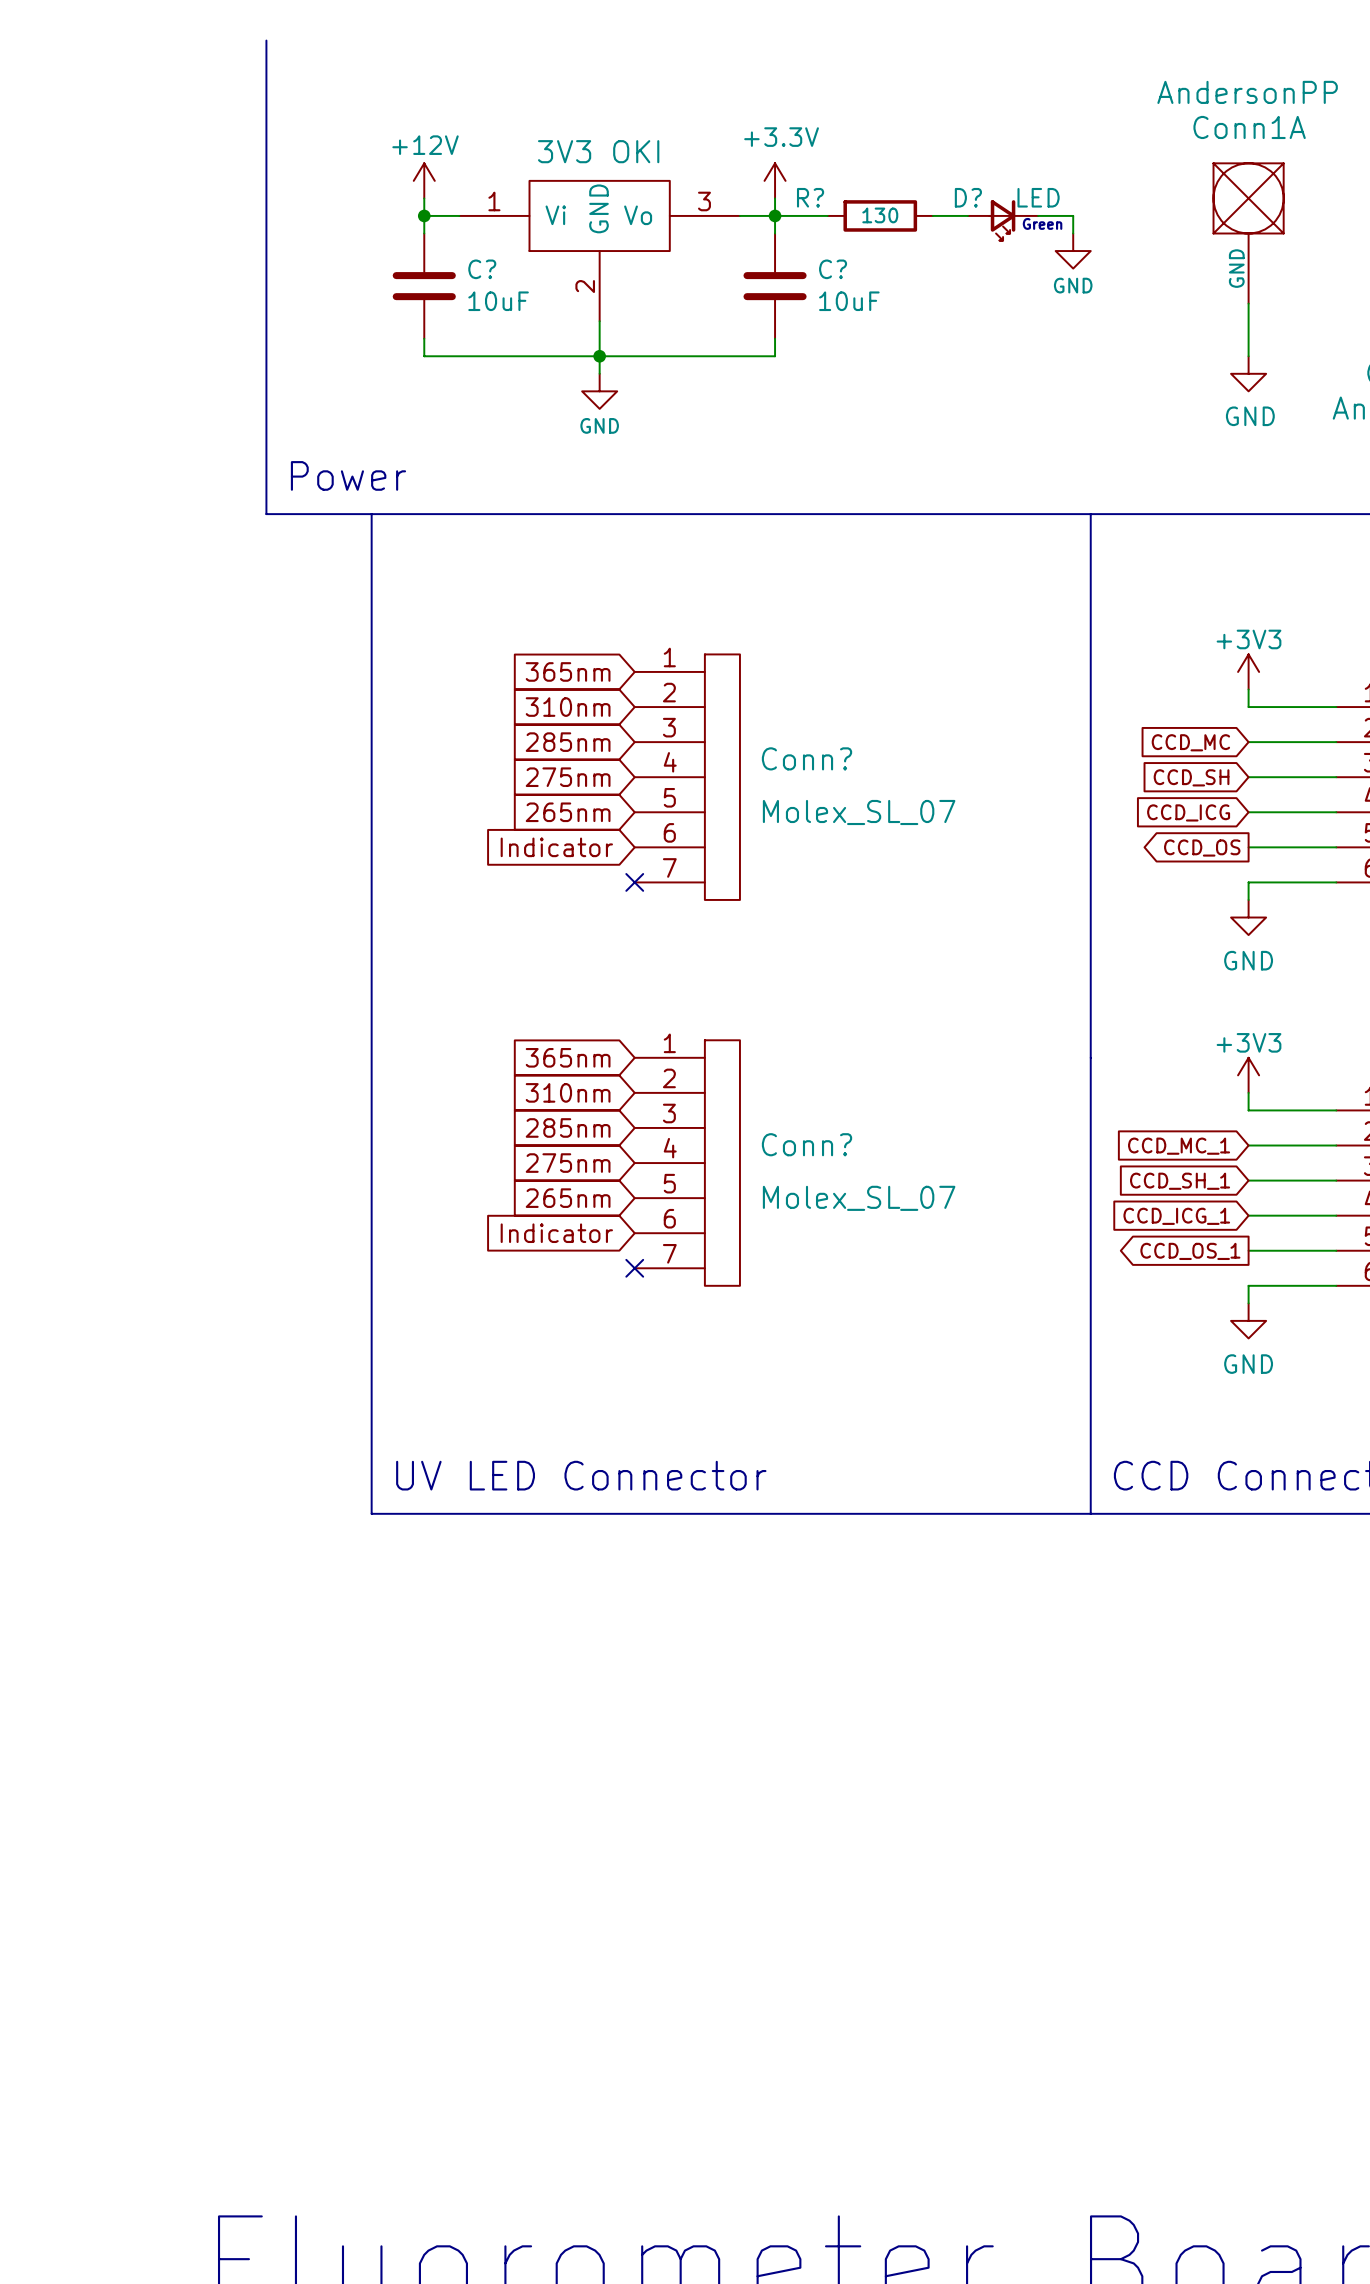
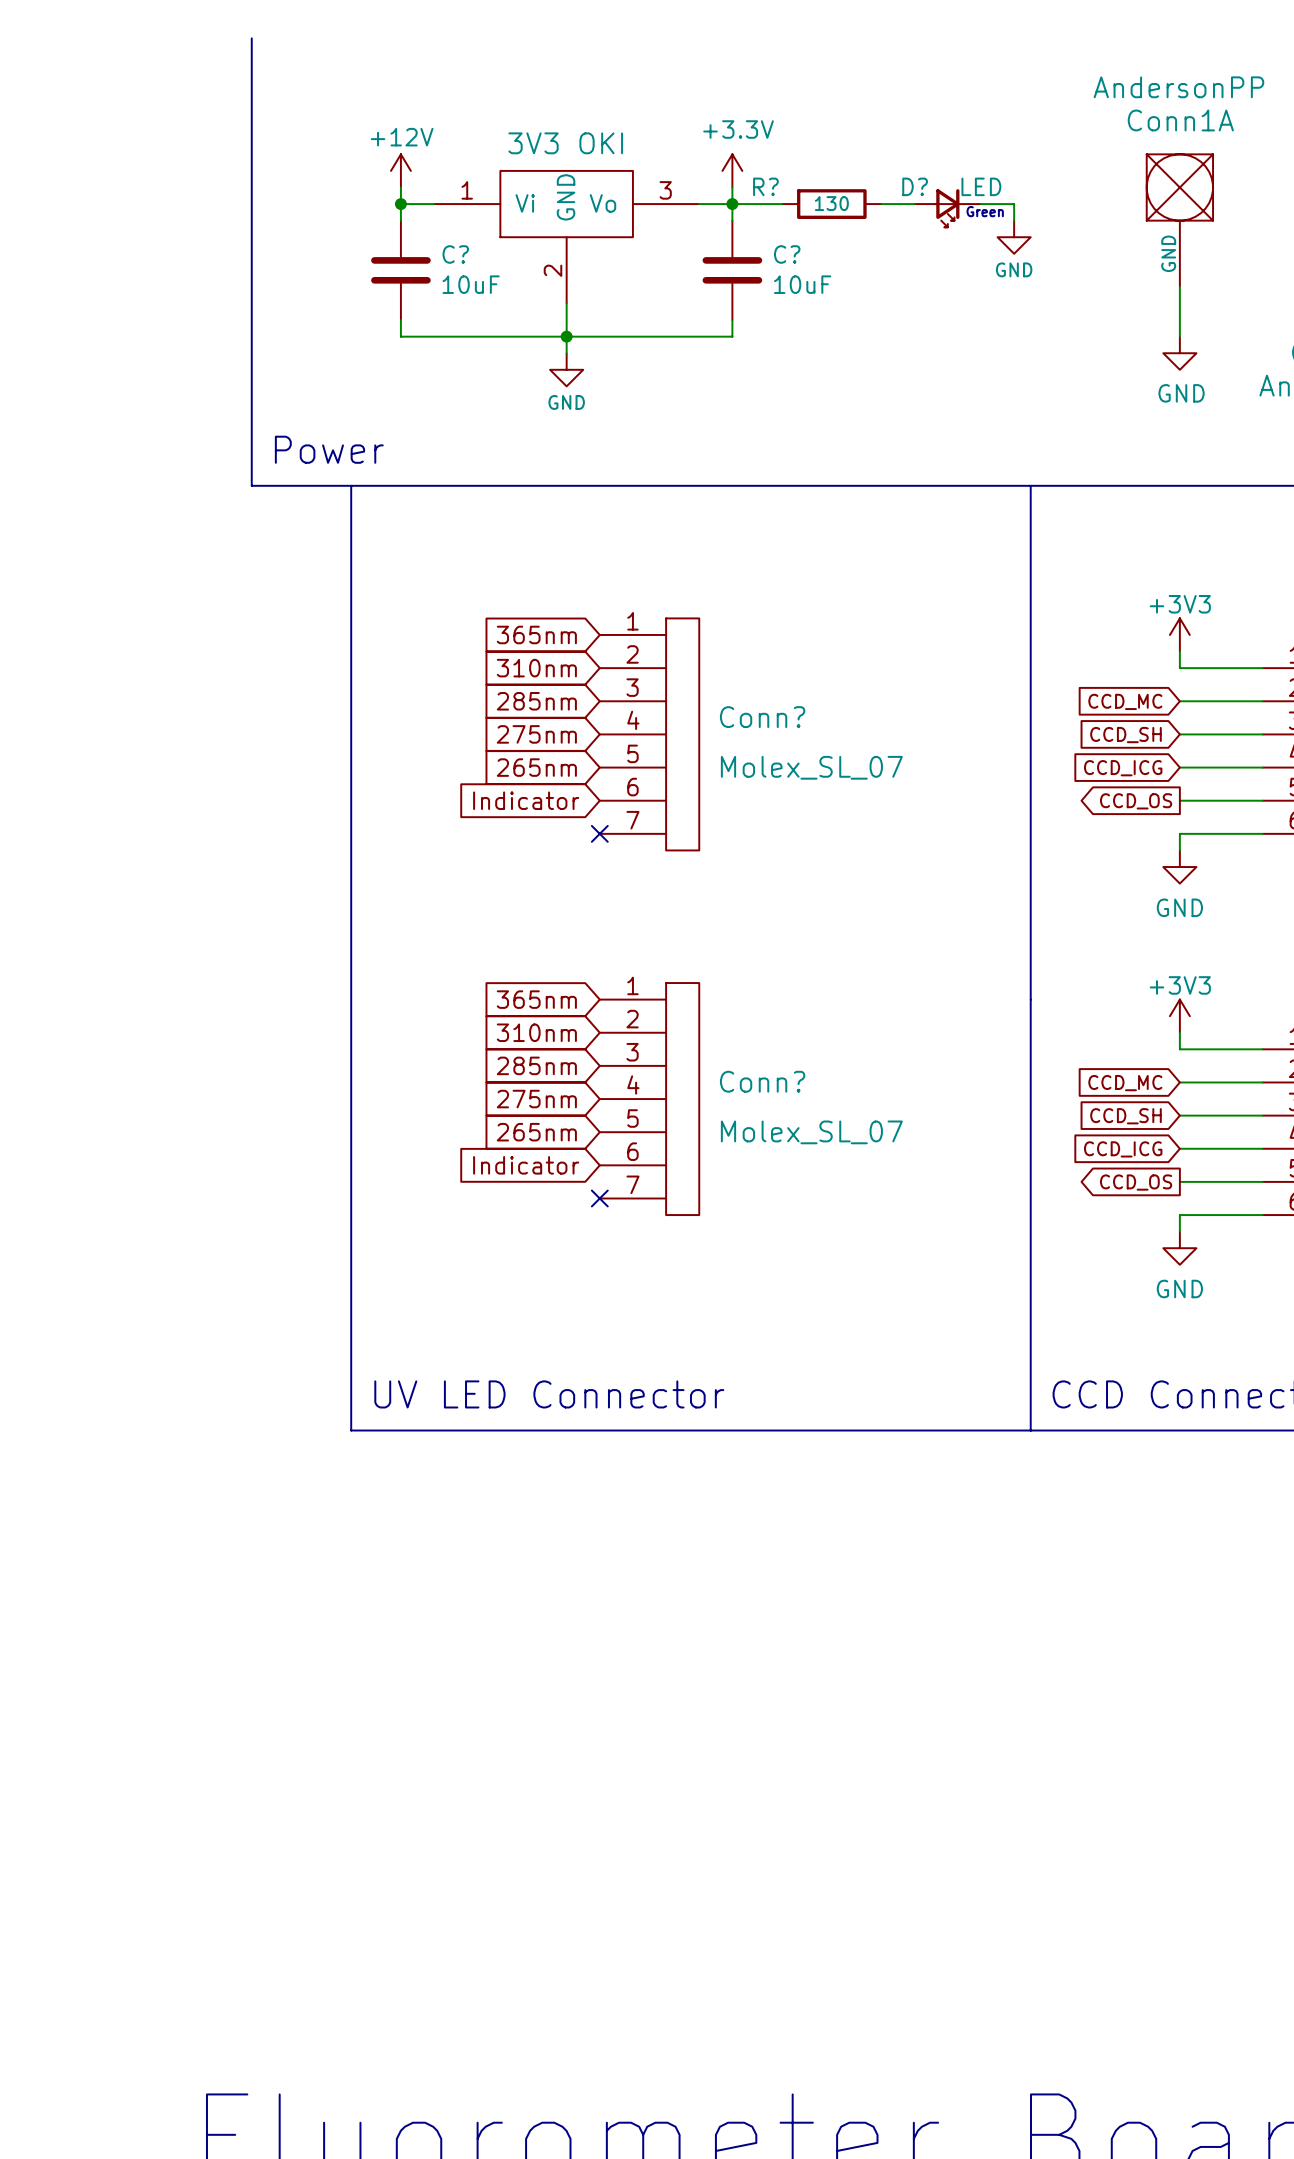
global label: CCD_MC_1 (1179, 1146) -> CCD_MC (1125, 1083)
global label: CCD_SH_1 (1180, 1181) -> CCD_SH (1125, 1116)
global label: CCD_ICG_1 (1176, 1216) -> CCD_ICG (1123, 1149)
global label: CCD_OS_1 (1190, 1251) -> CCD_OS (1136, 1182)

